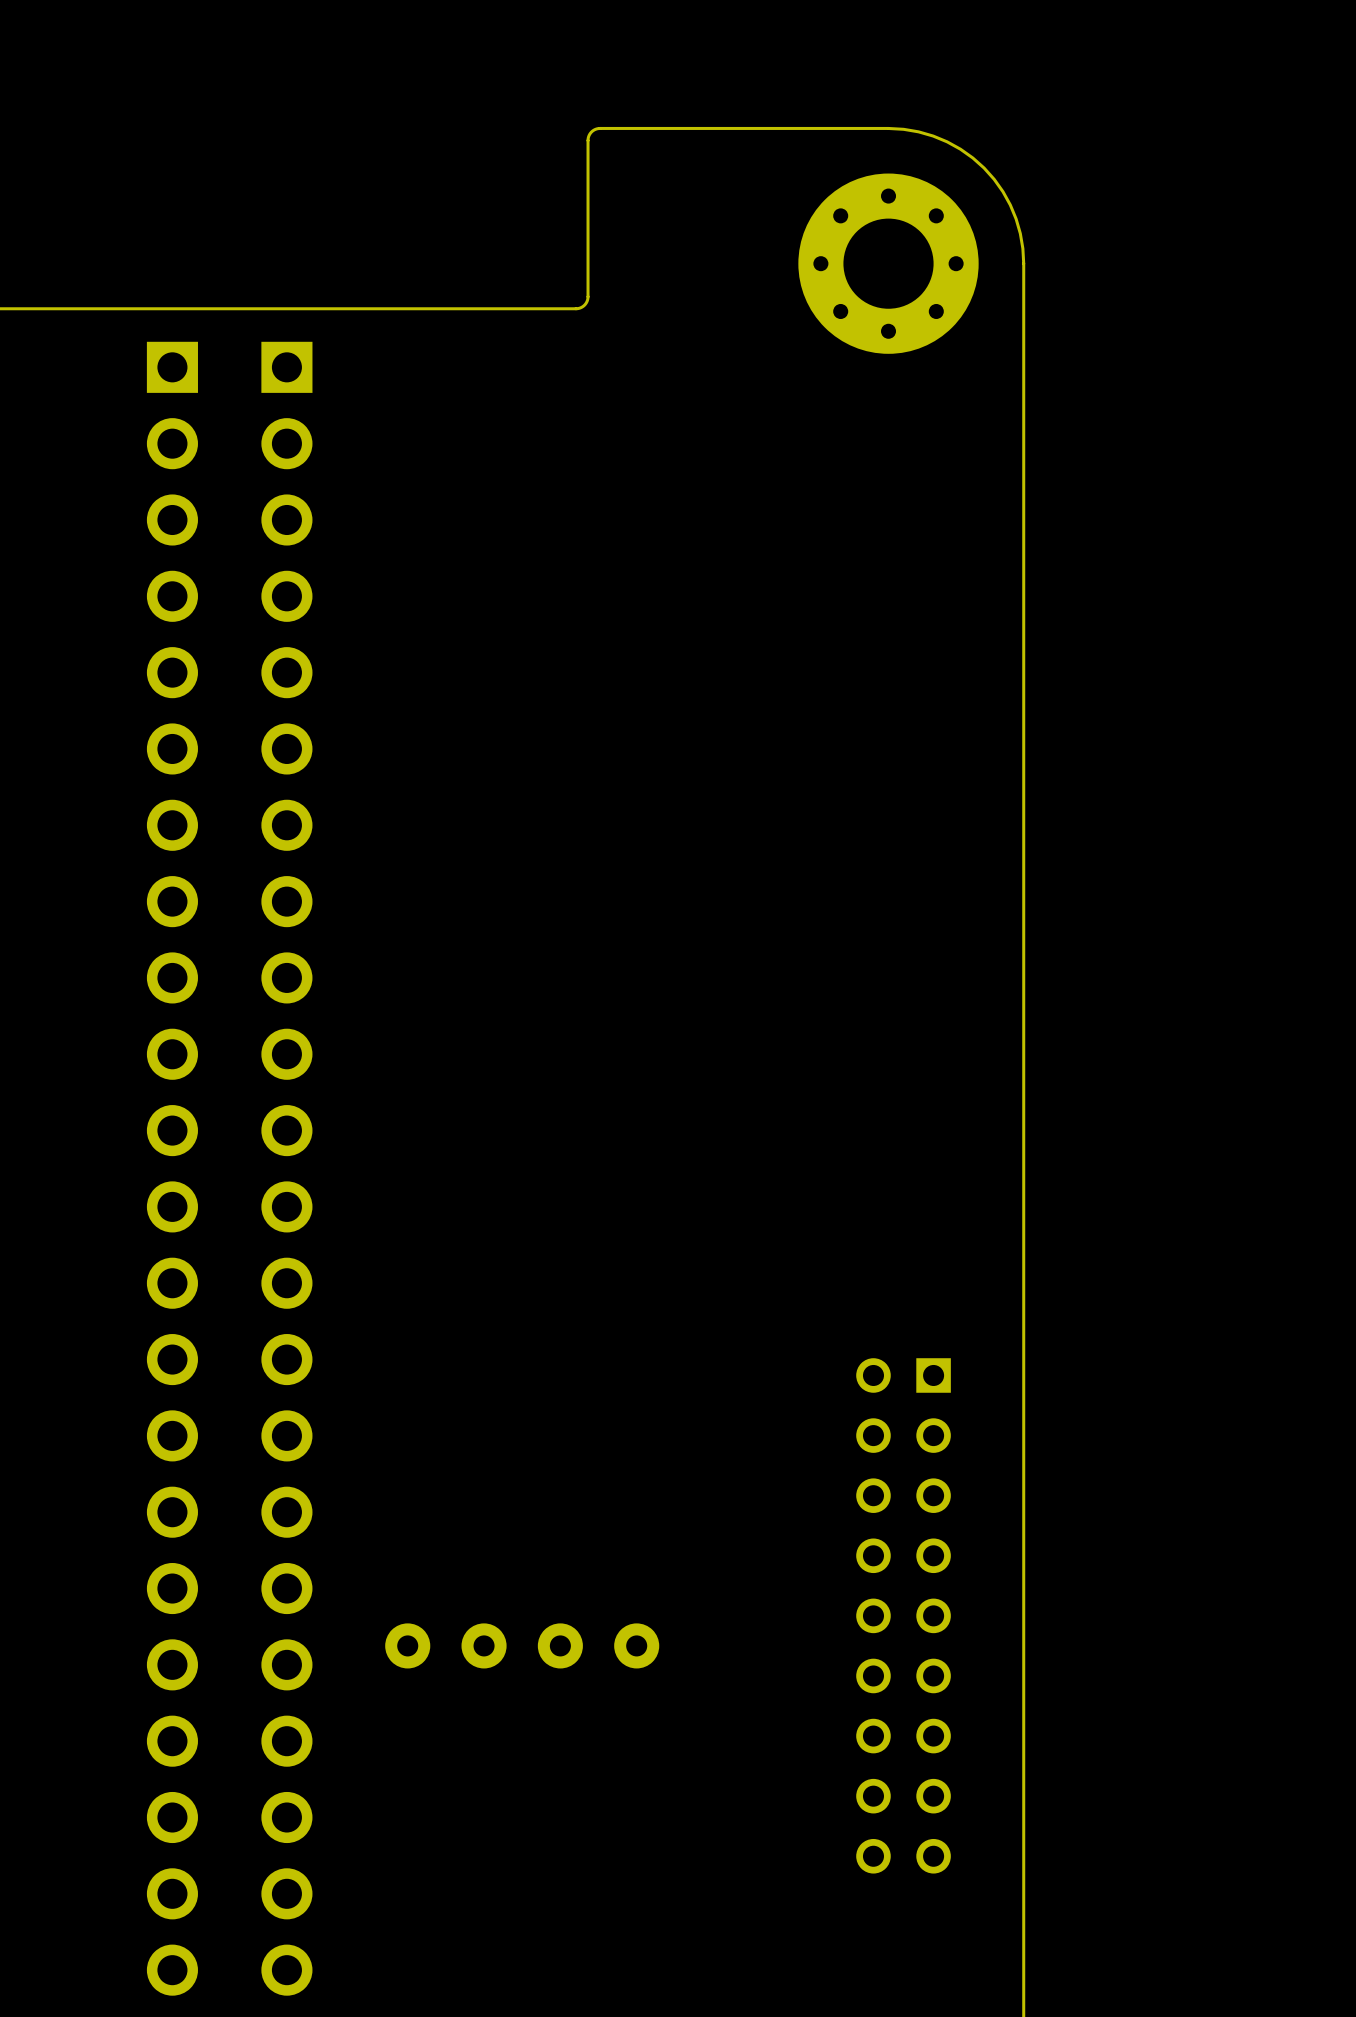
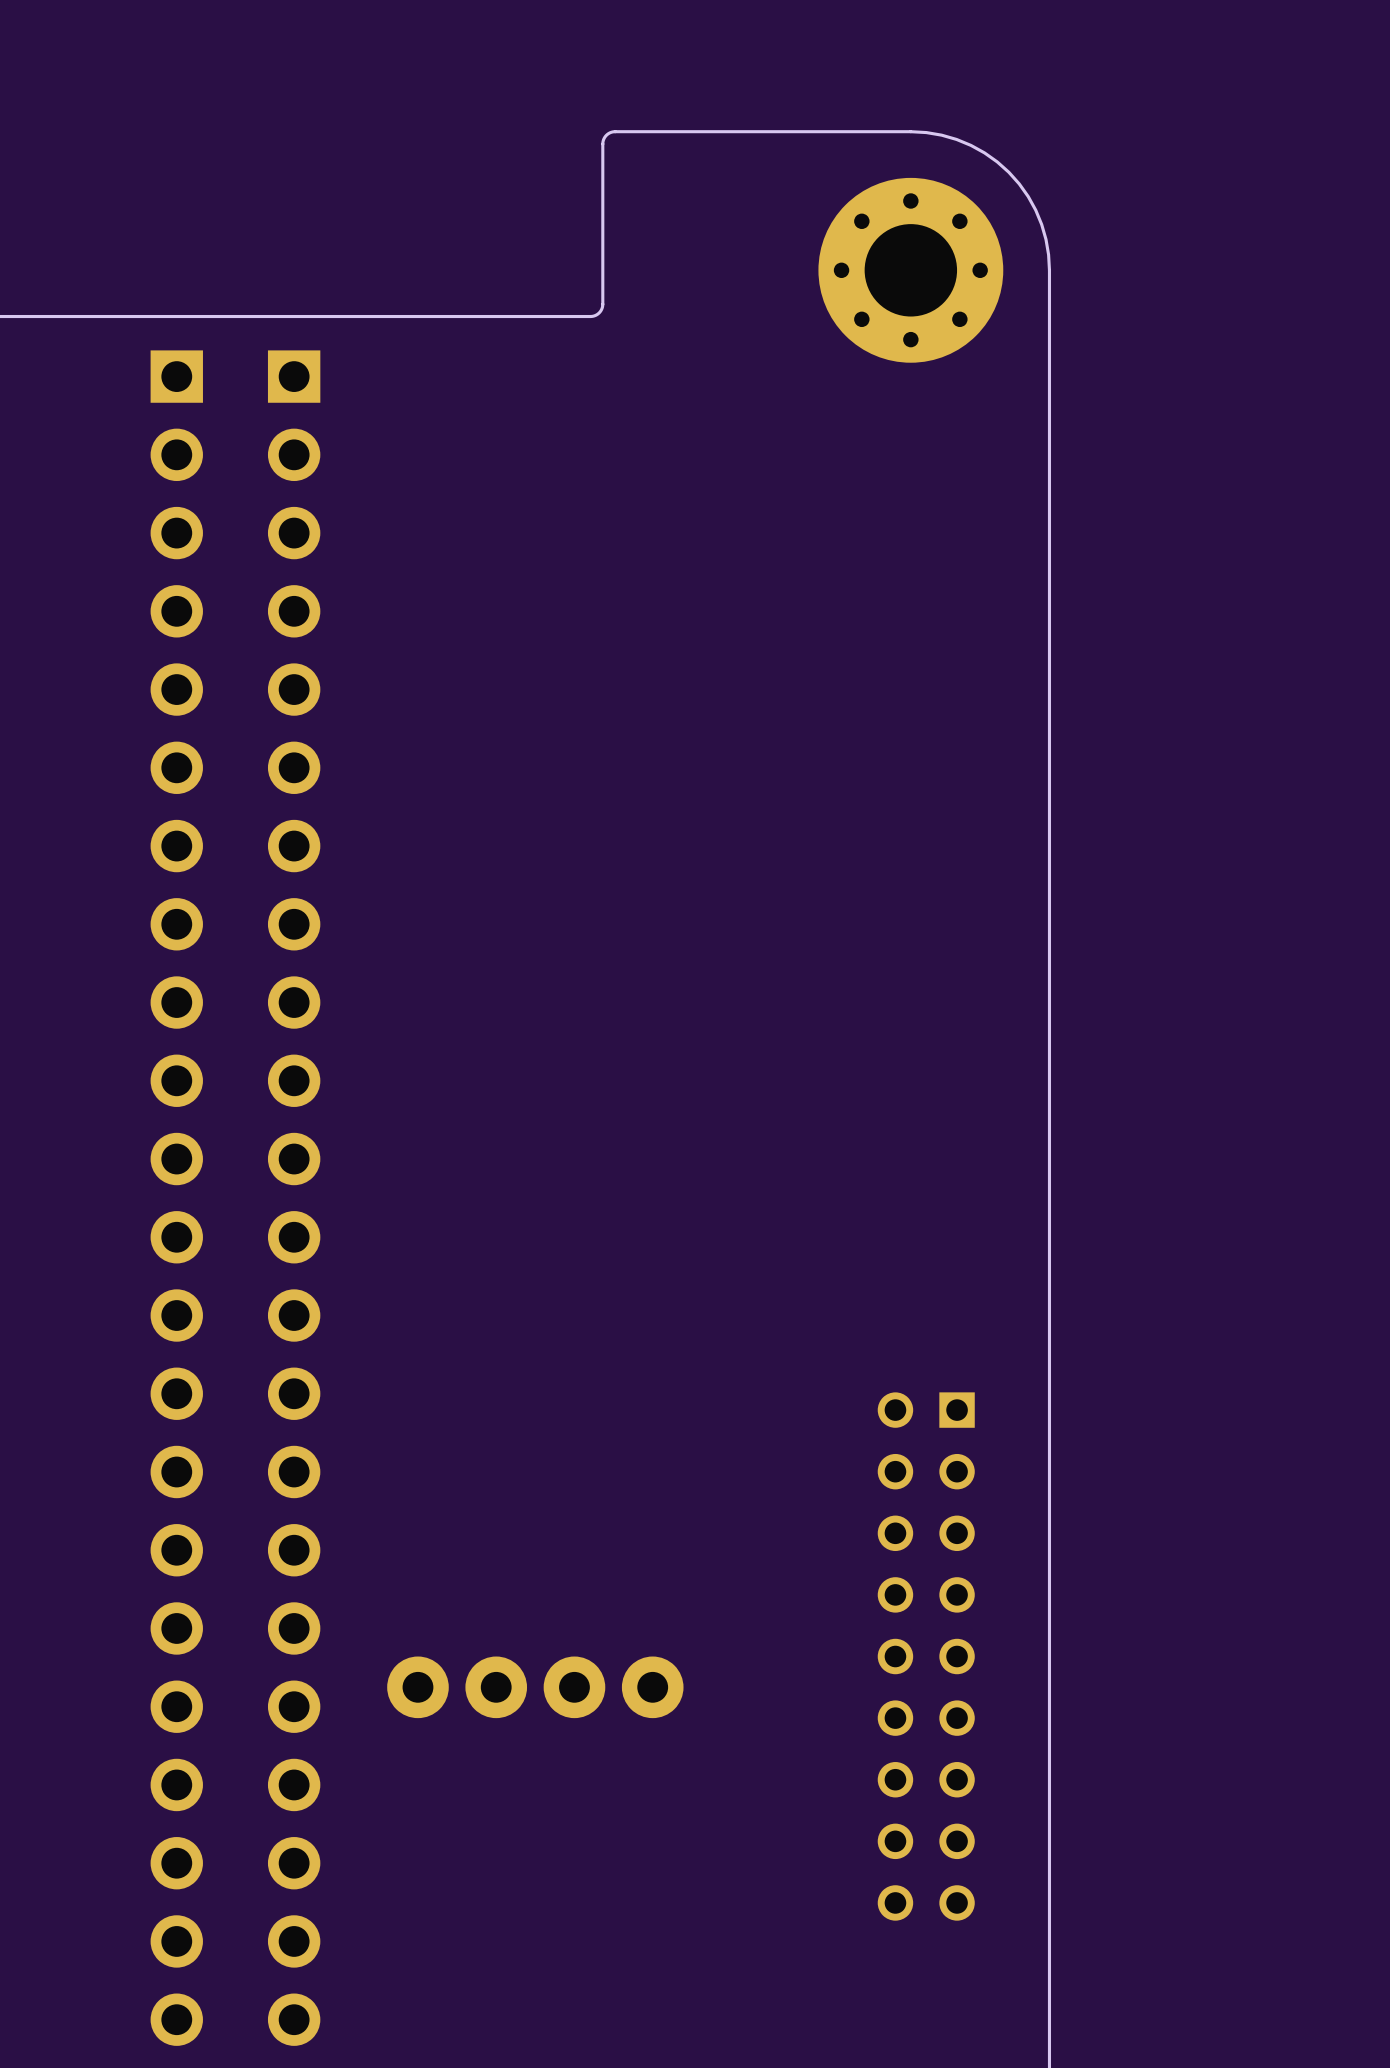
part footprint: [385, 1623, 431, 1669] -> [387, 1656, 449, 1719]
part footprint: [461, 1623, 507, 1669] -> [465, 1656, 528, 1719]
part footprint: [537, 1623, 583, 1669] -> [543, 1656, 606, 1719]
part footprint: [614, 1623, 660, 1669] -> [621, 1656, 684, 1719]

